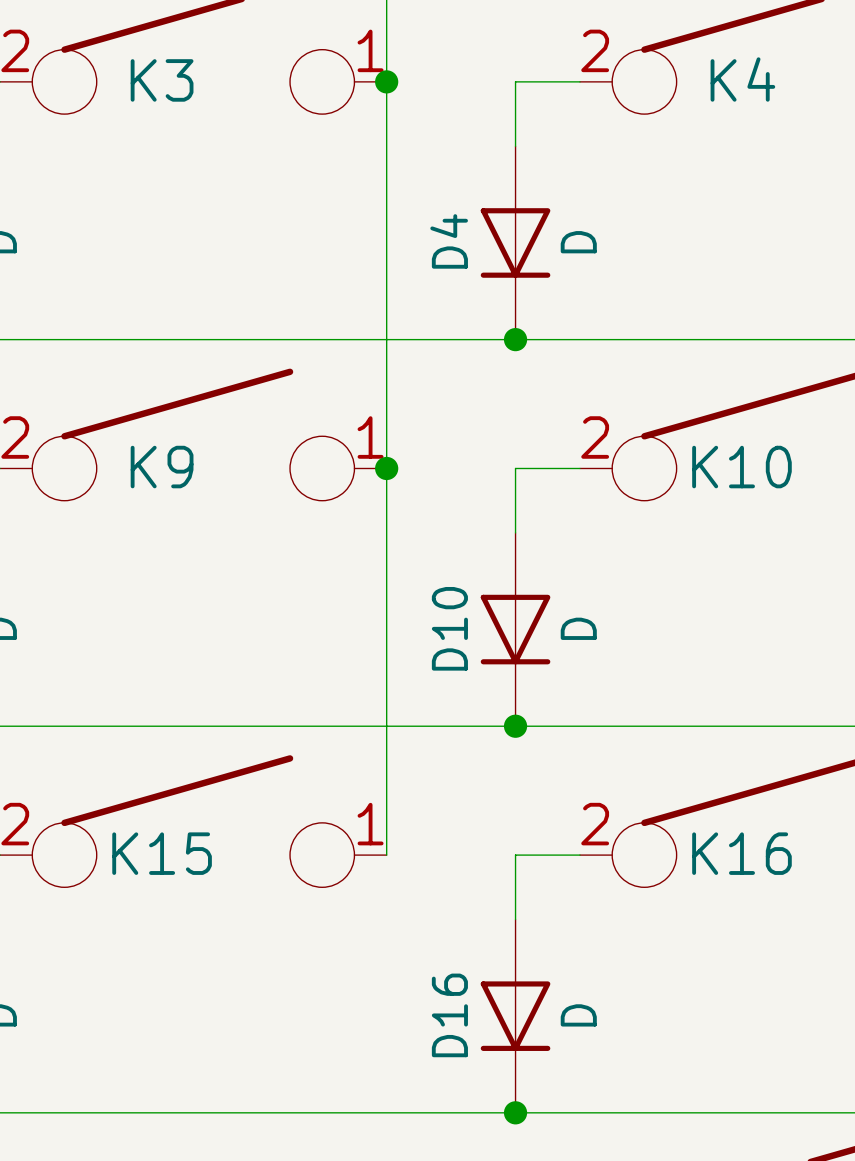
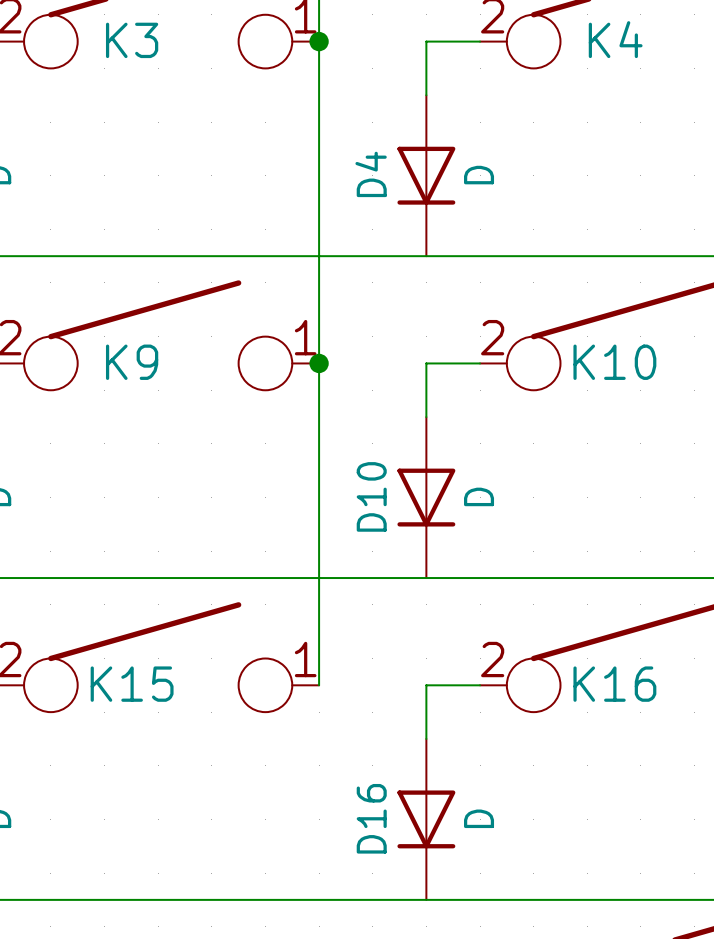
junction: (515, 339) -> none
junction: (515, 726) -> none
junction: (515, 1112) -> none

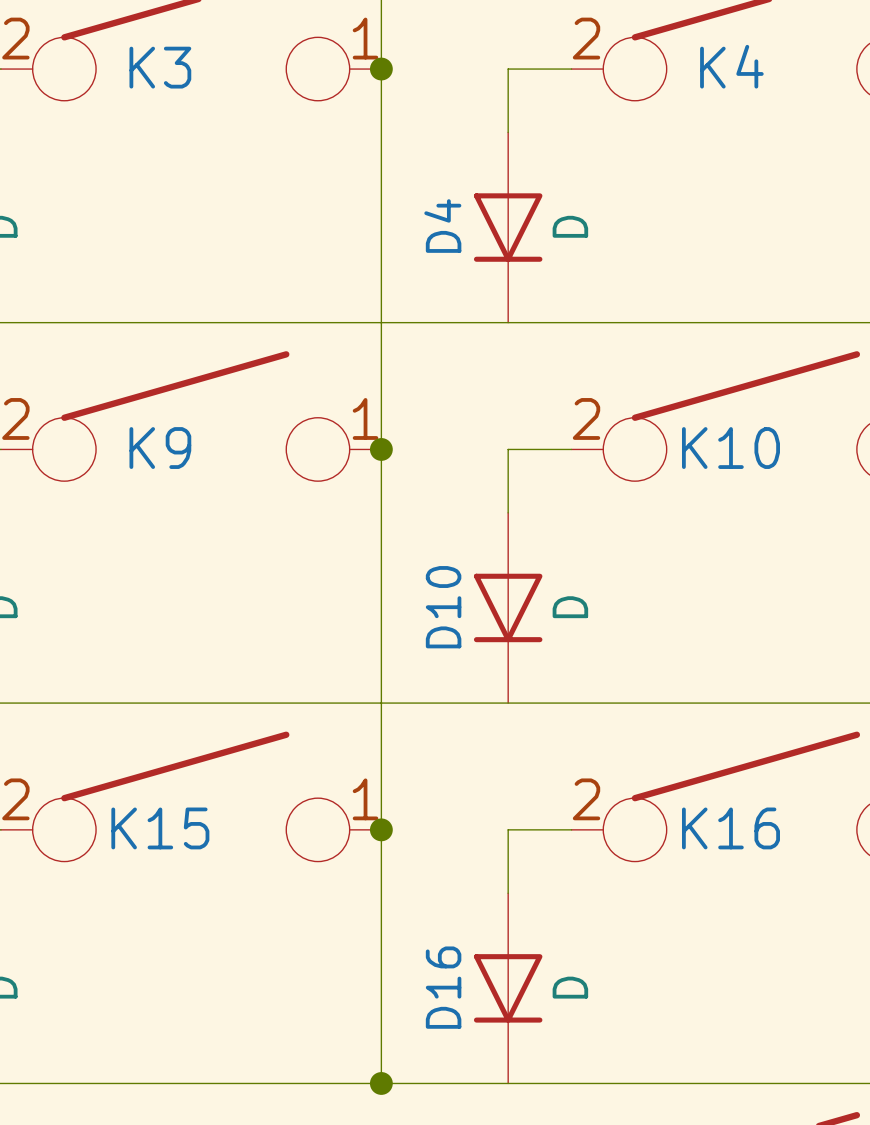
wire: none -> (381, 829) (381, 1083)
junction: none -> (381, 829)
junction: none -> (381, 1083)

